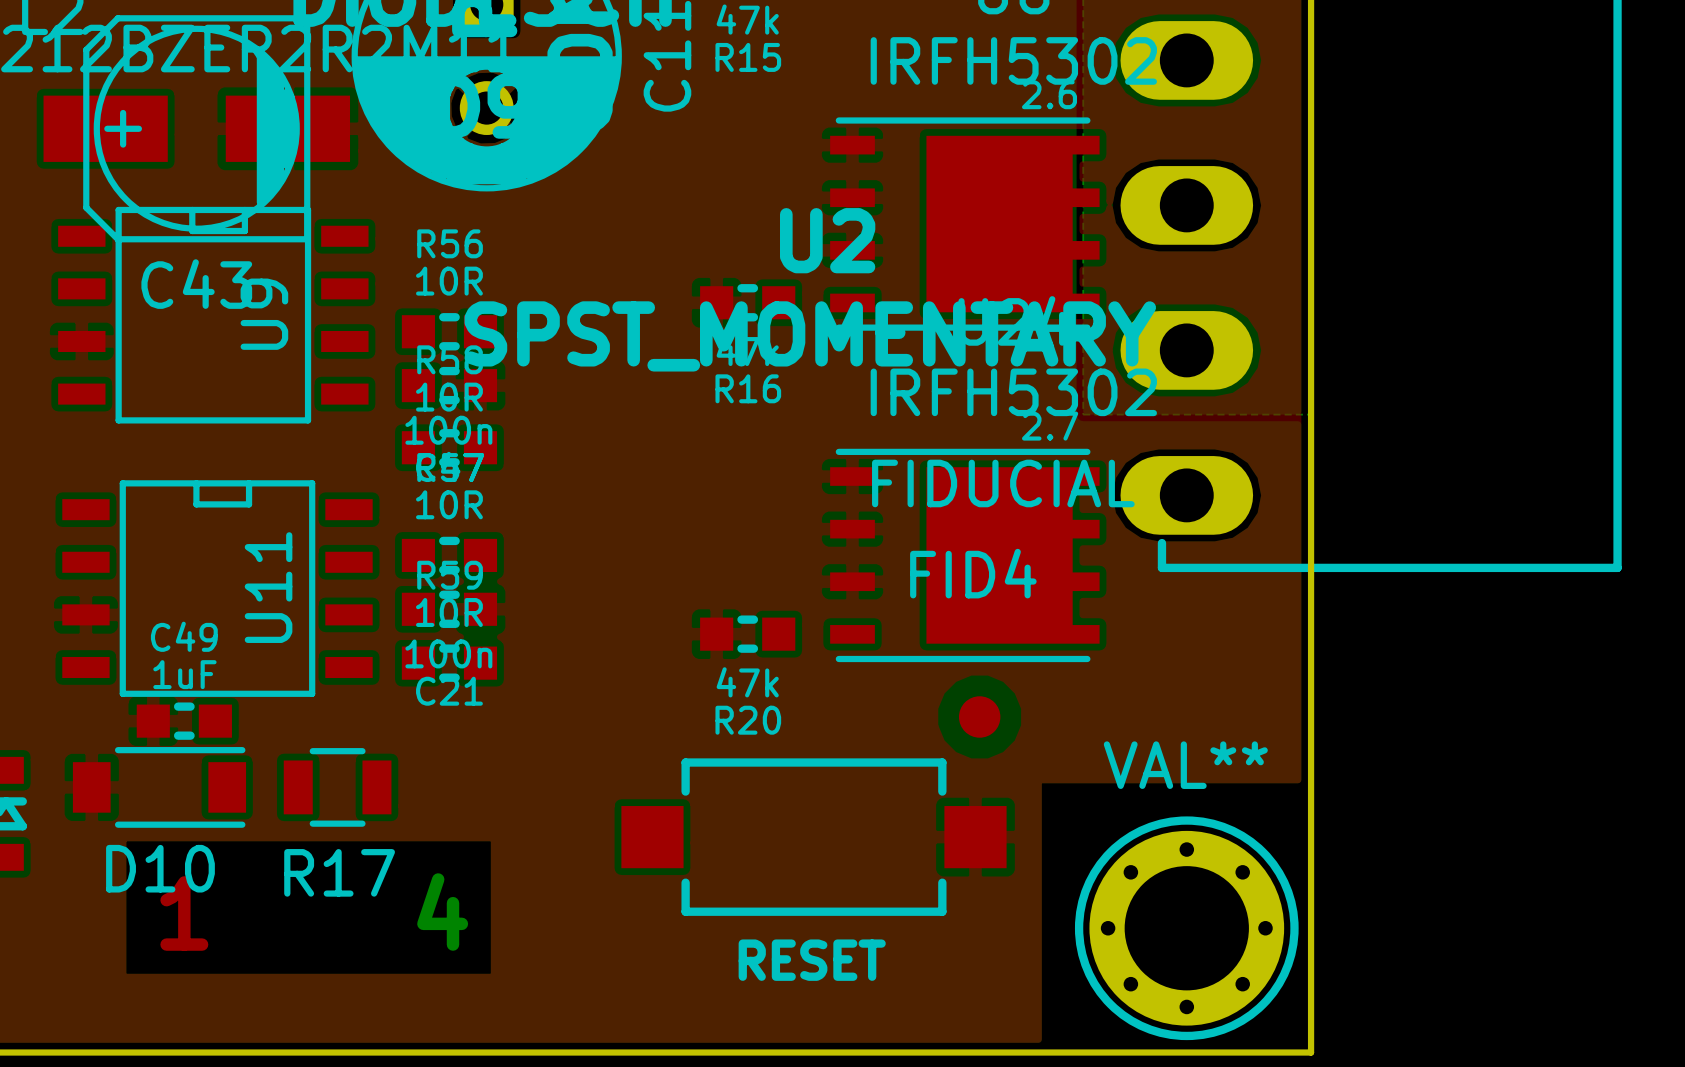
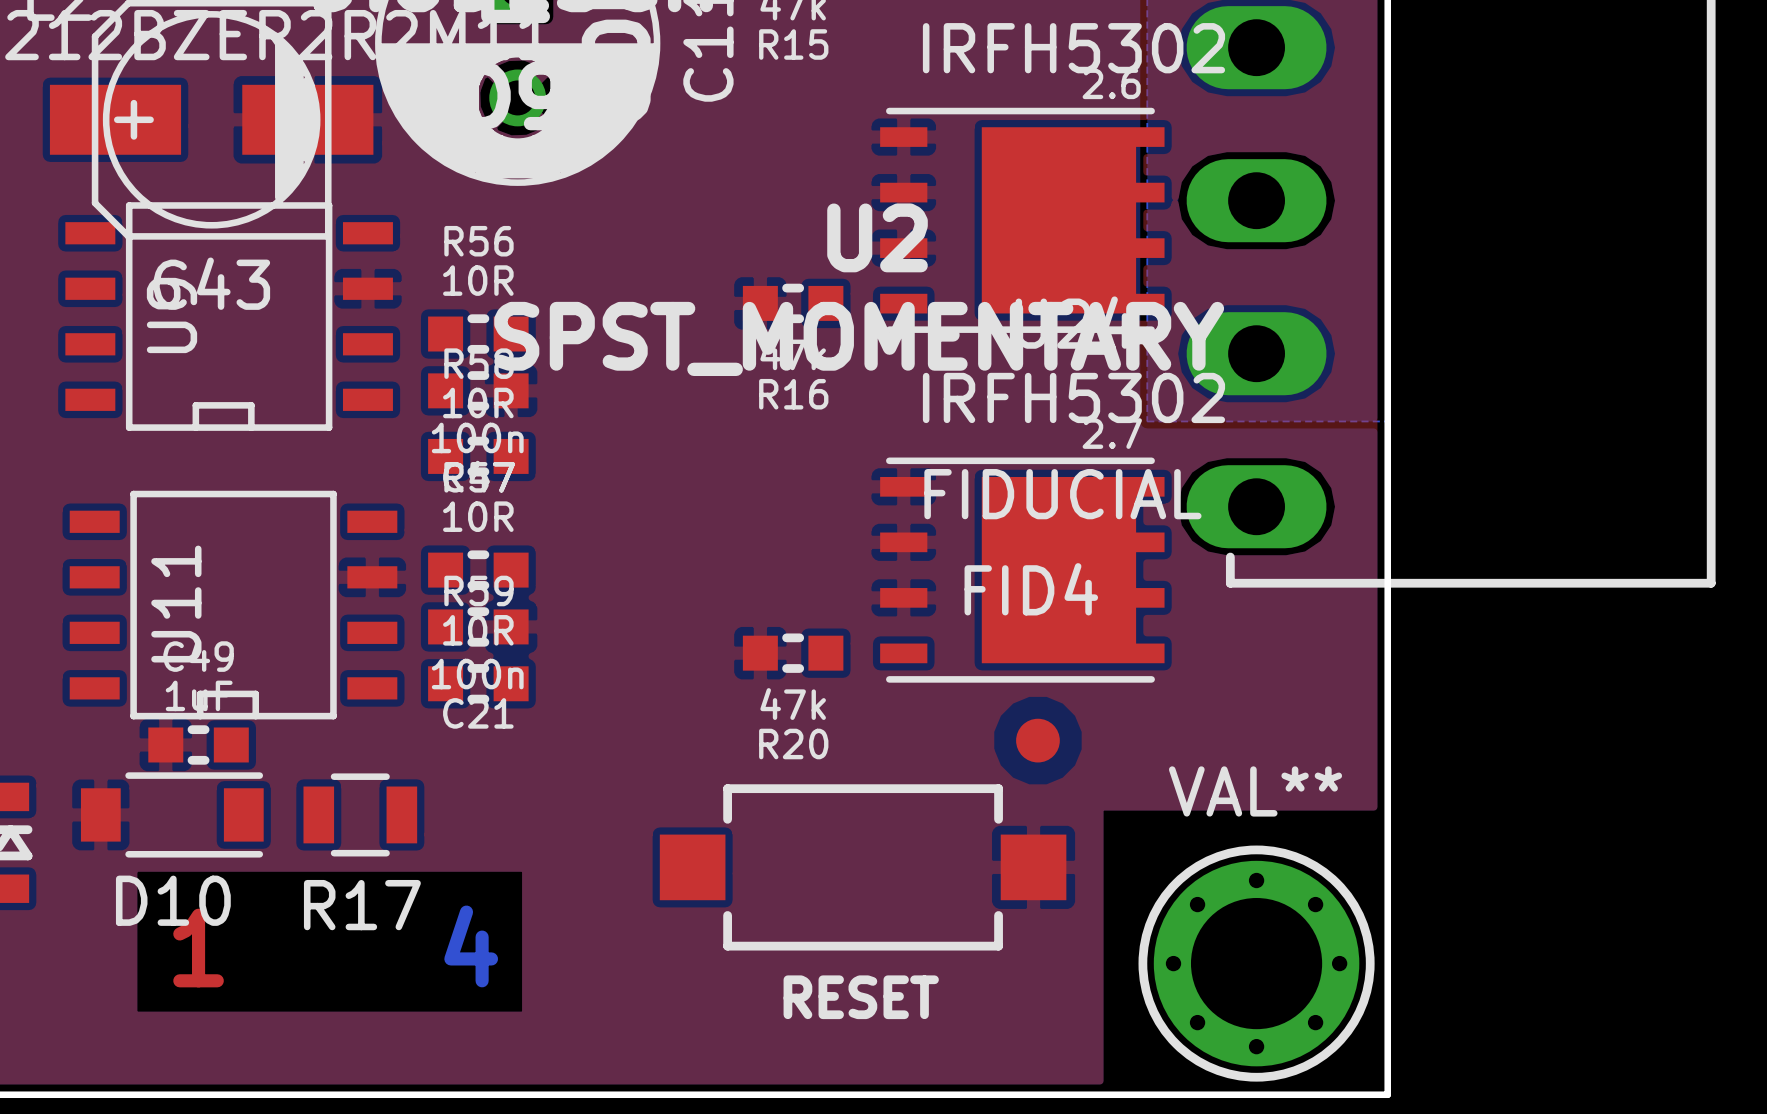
U9 rotation: 0° (213, 315) -> 180° (229, 316)
U11 rotation: 0° (217, 588) -> 180° (233, 605)

